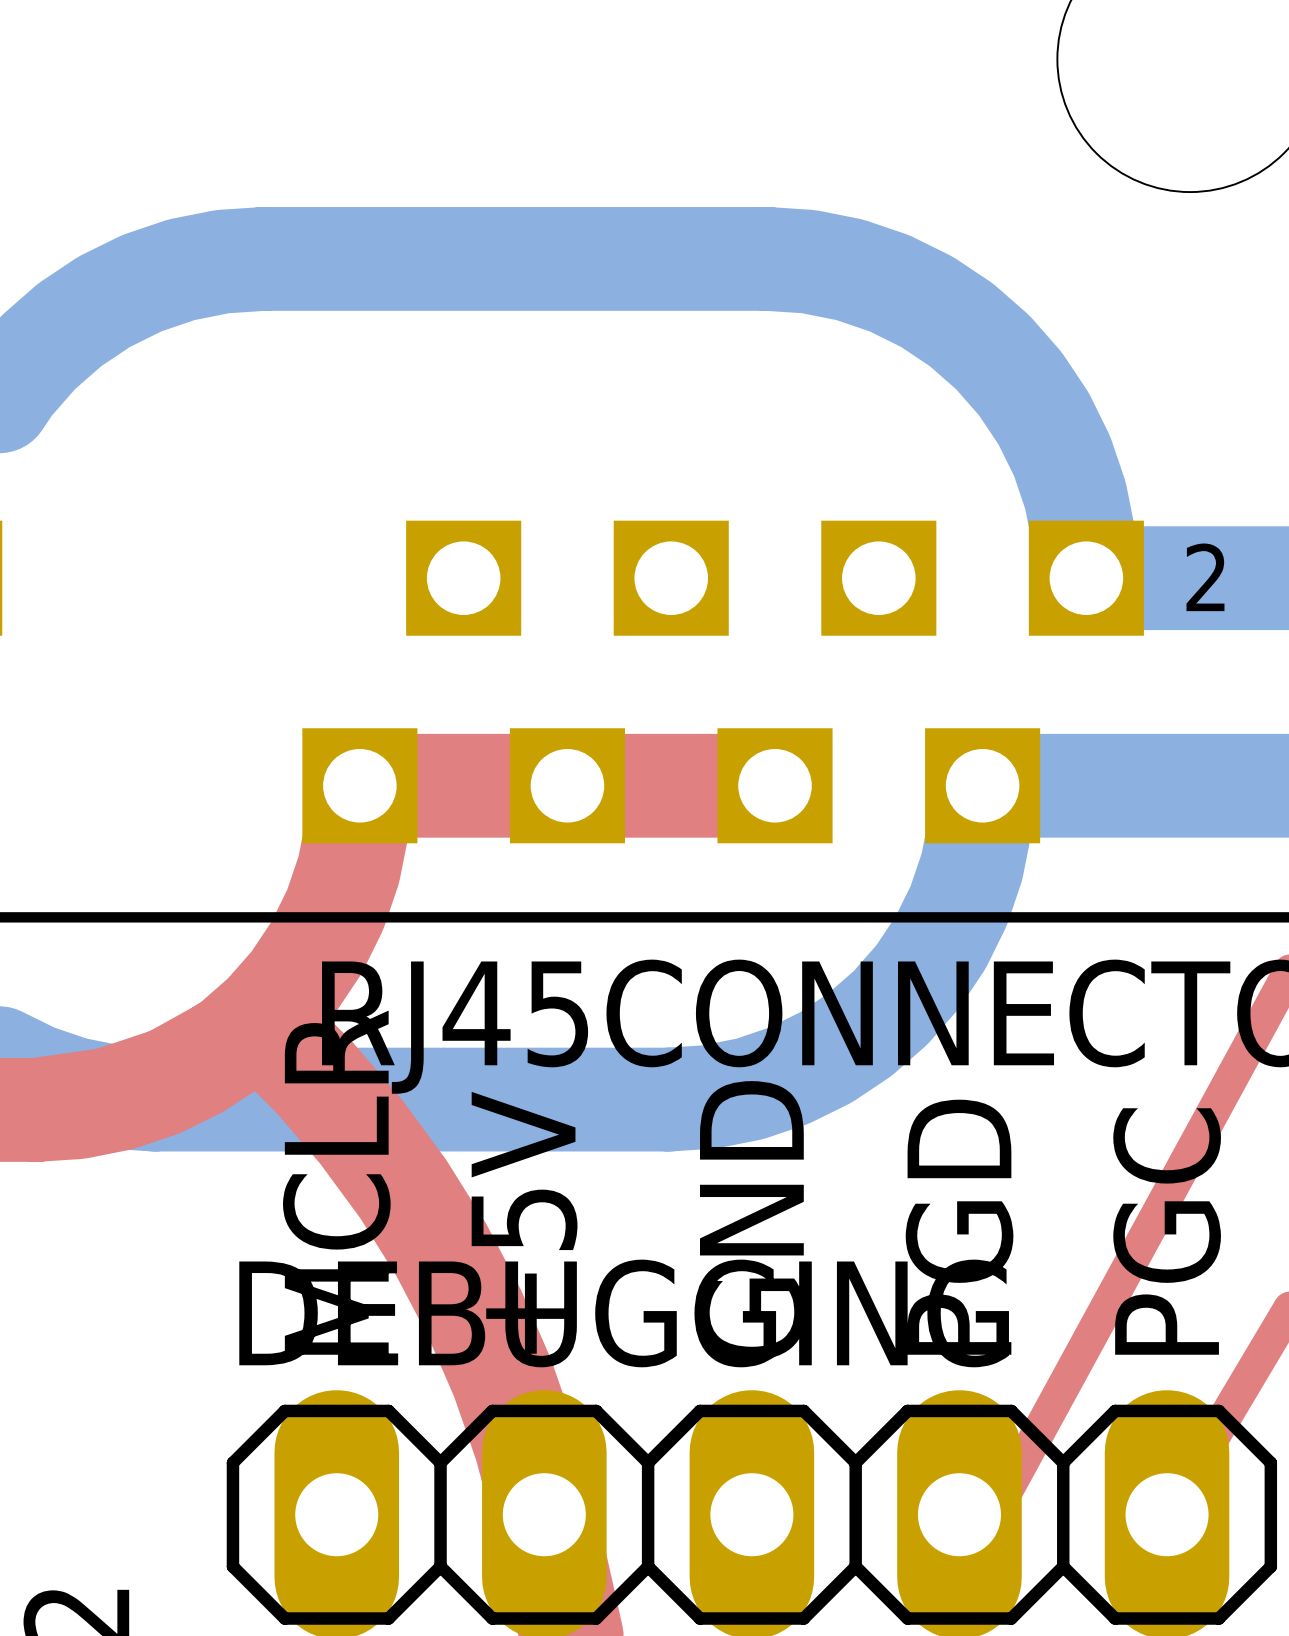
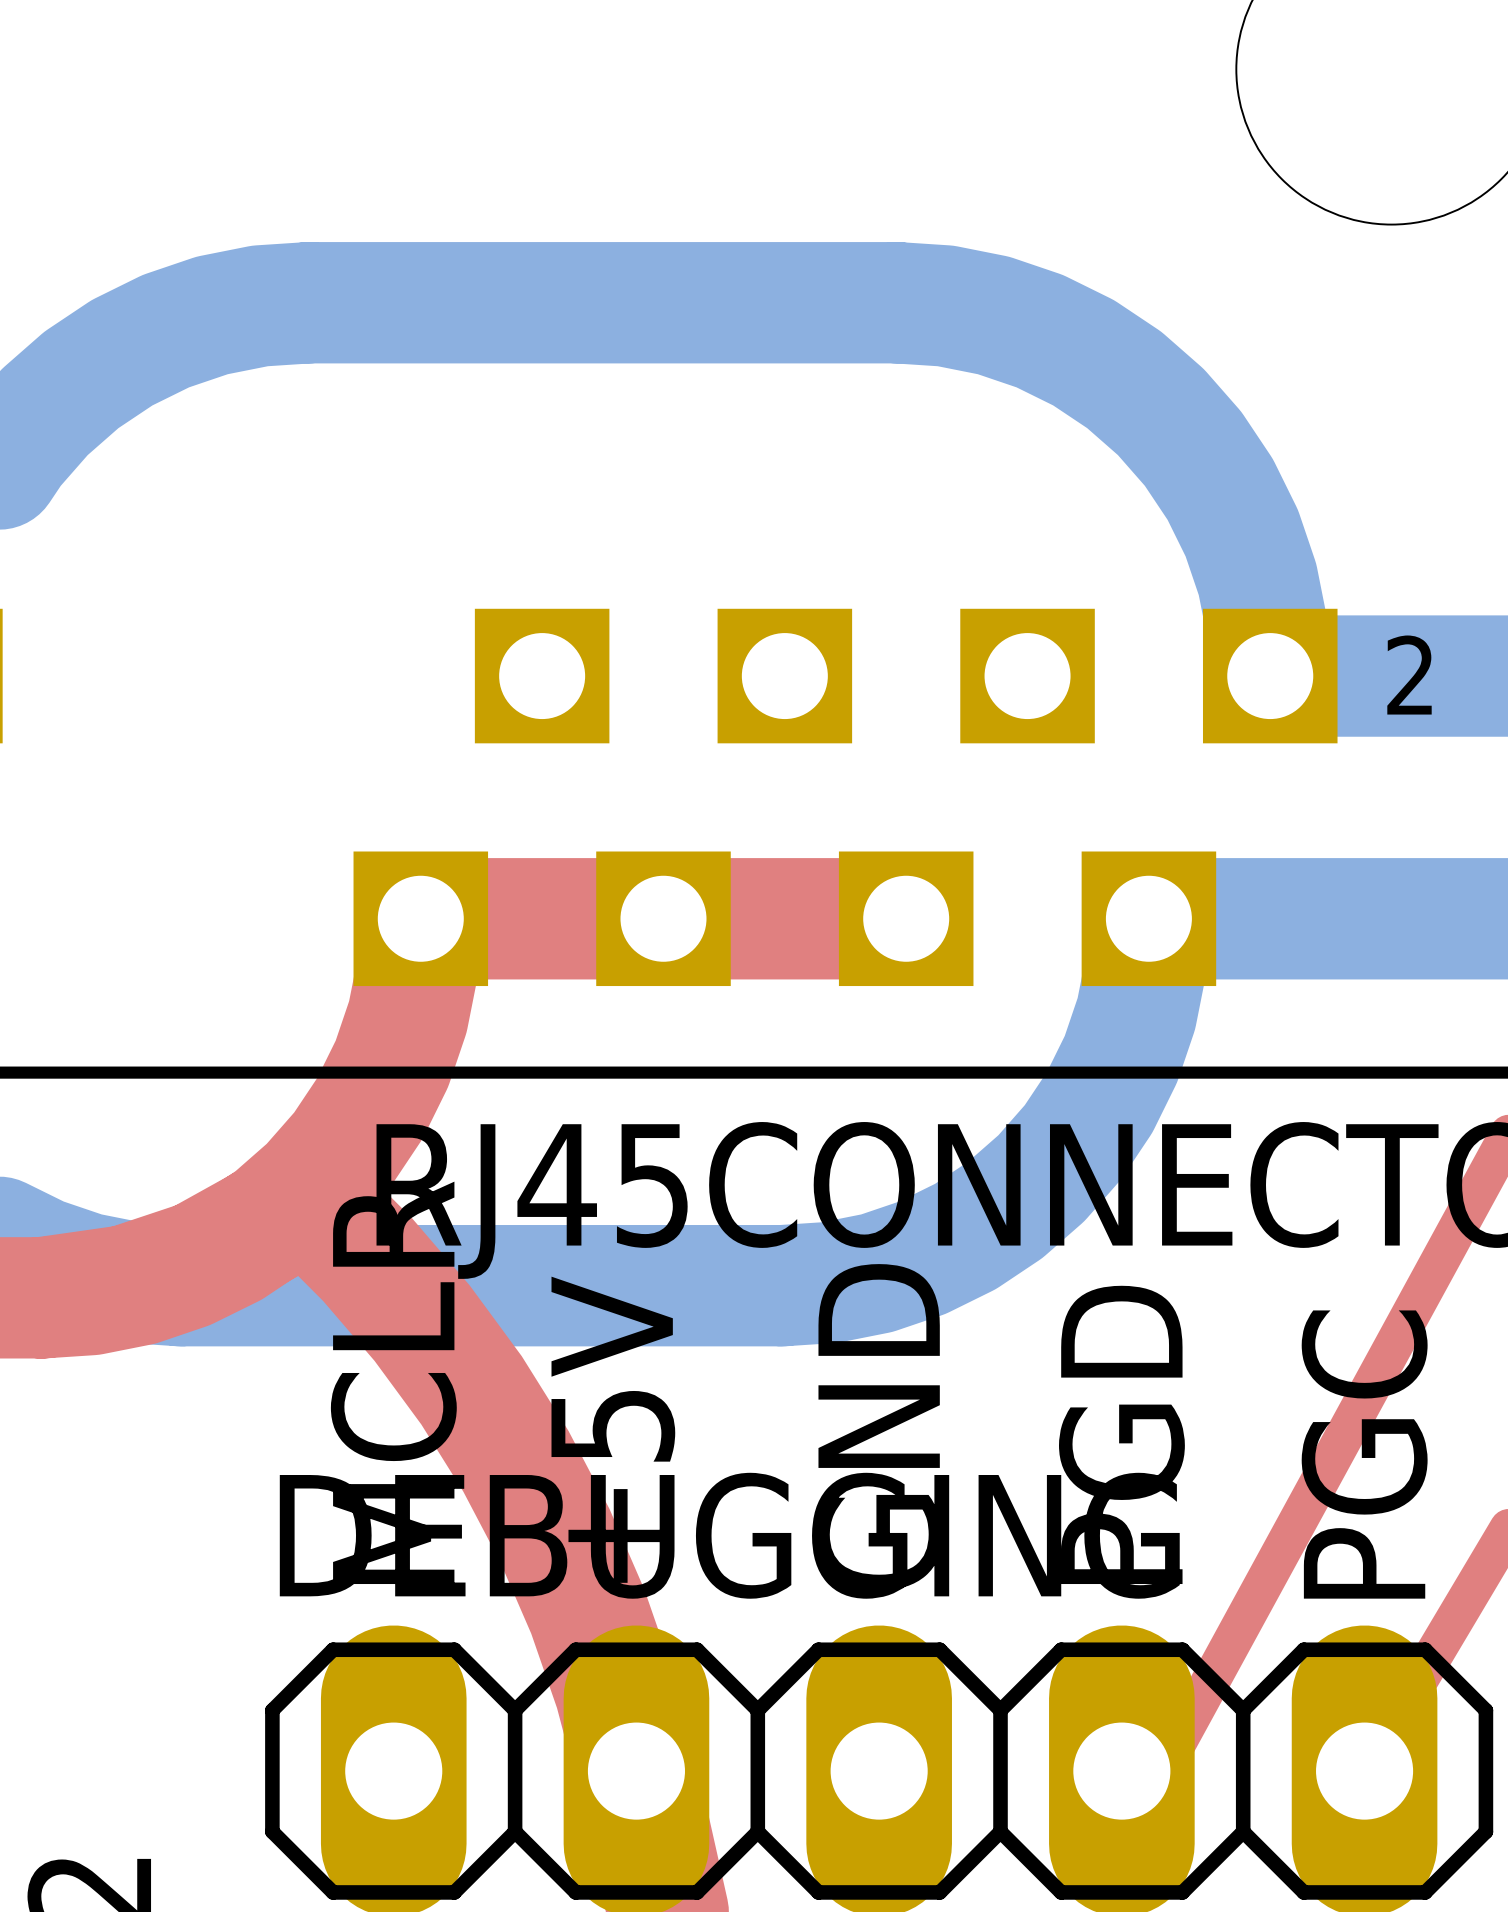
text position: PGC (1167, 1231) -> PGC (1364, 1454)

